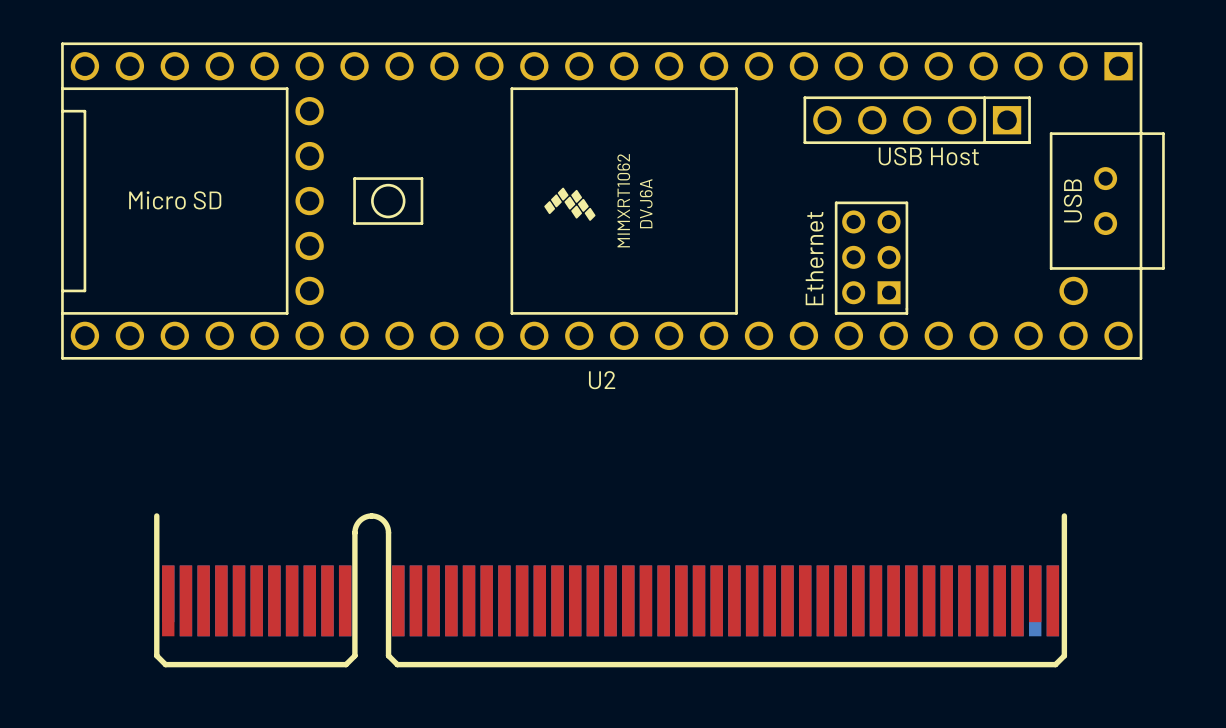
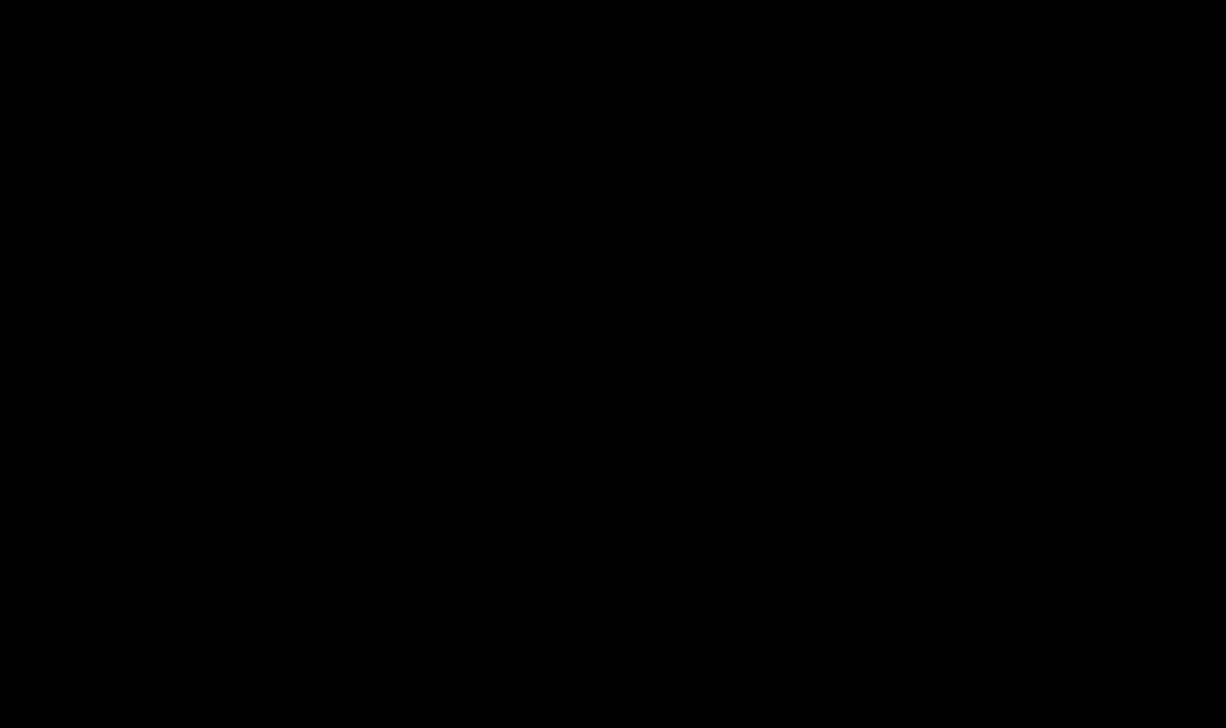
U2: (612, 201) -> none
part: (610, 590) -> none

